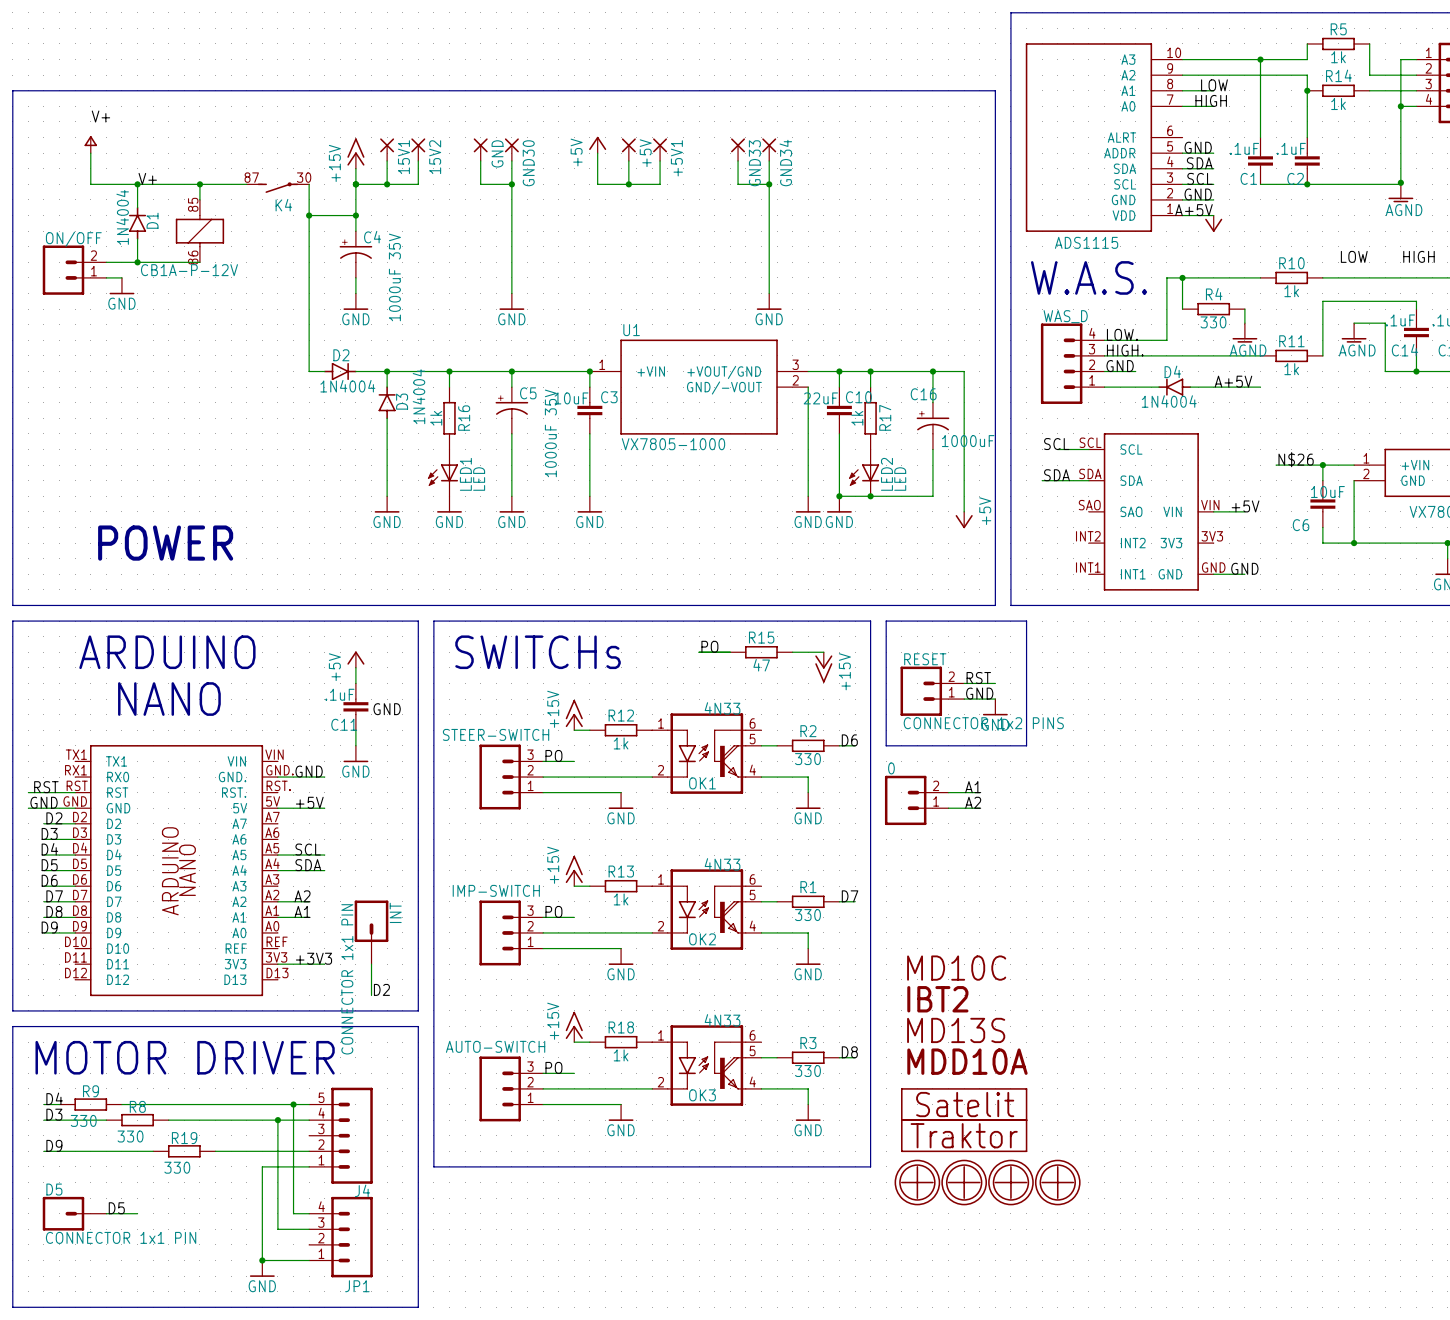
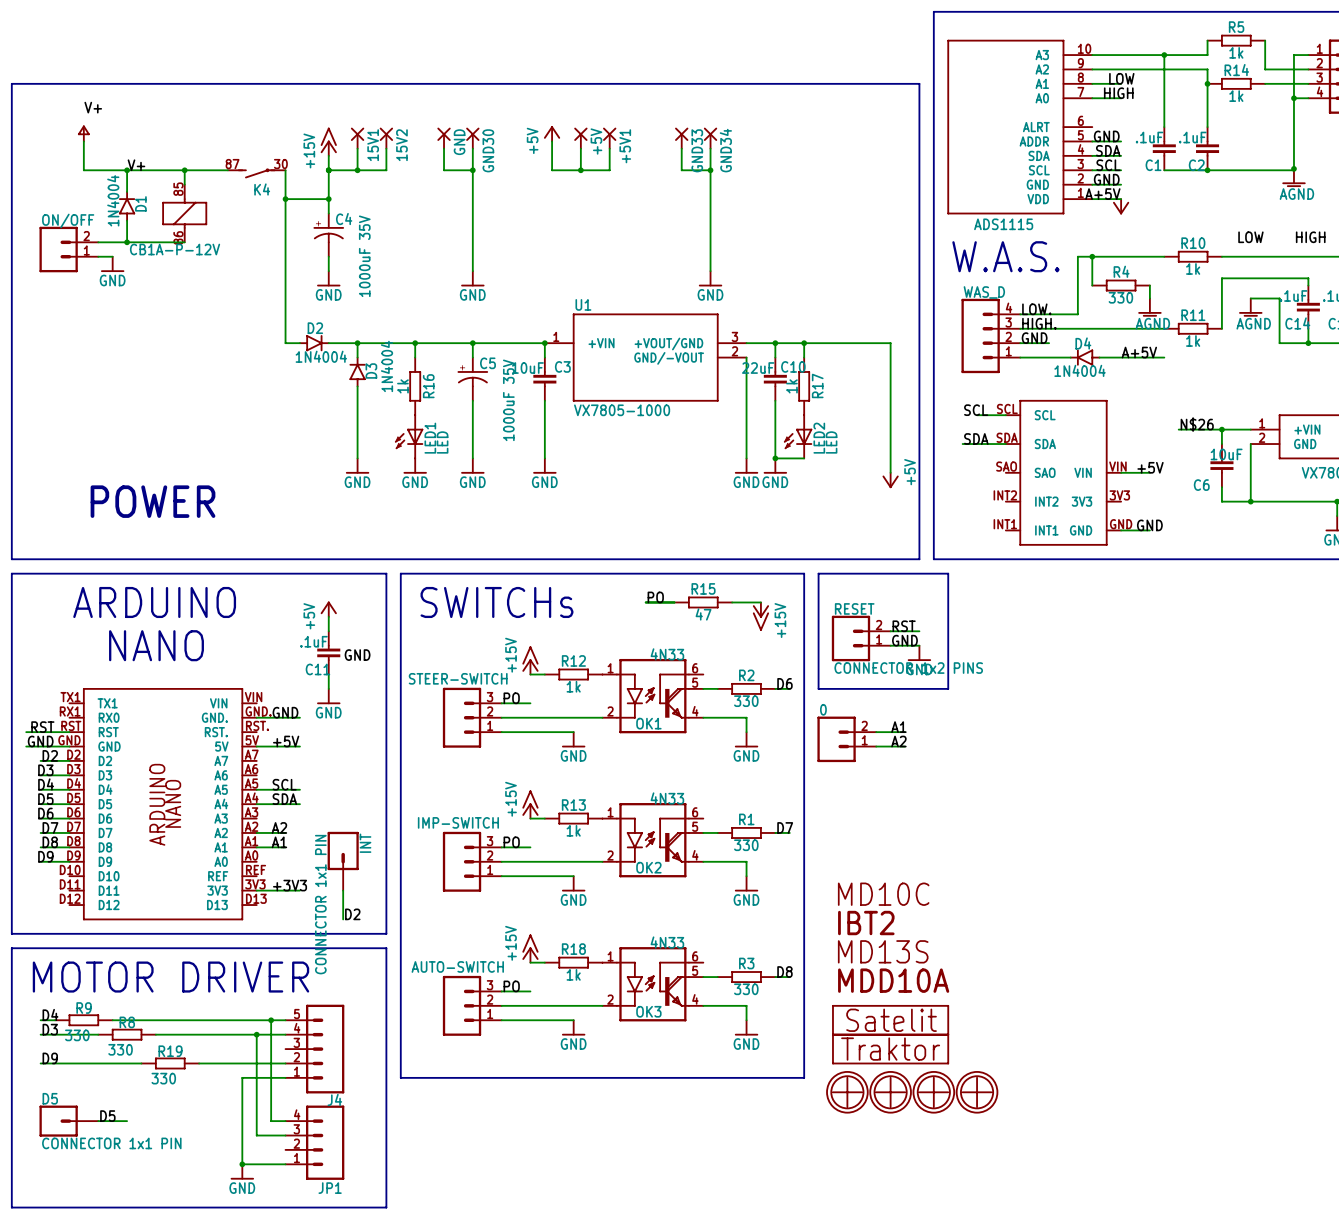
wire: (932, 371) (932, 402) -> none
junction: (932, 371) -> none
C16: 1000uF (932, 426) -> none
wire: (932, 449) (932, 496) (870, 496) -> none
junction: (870, 496) -> none

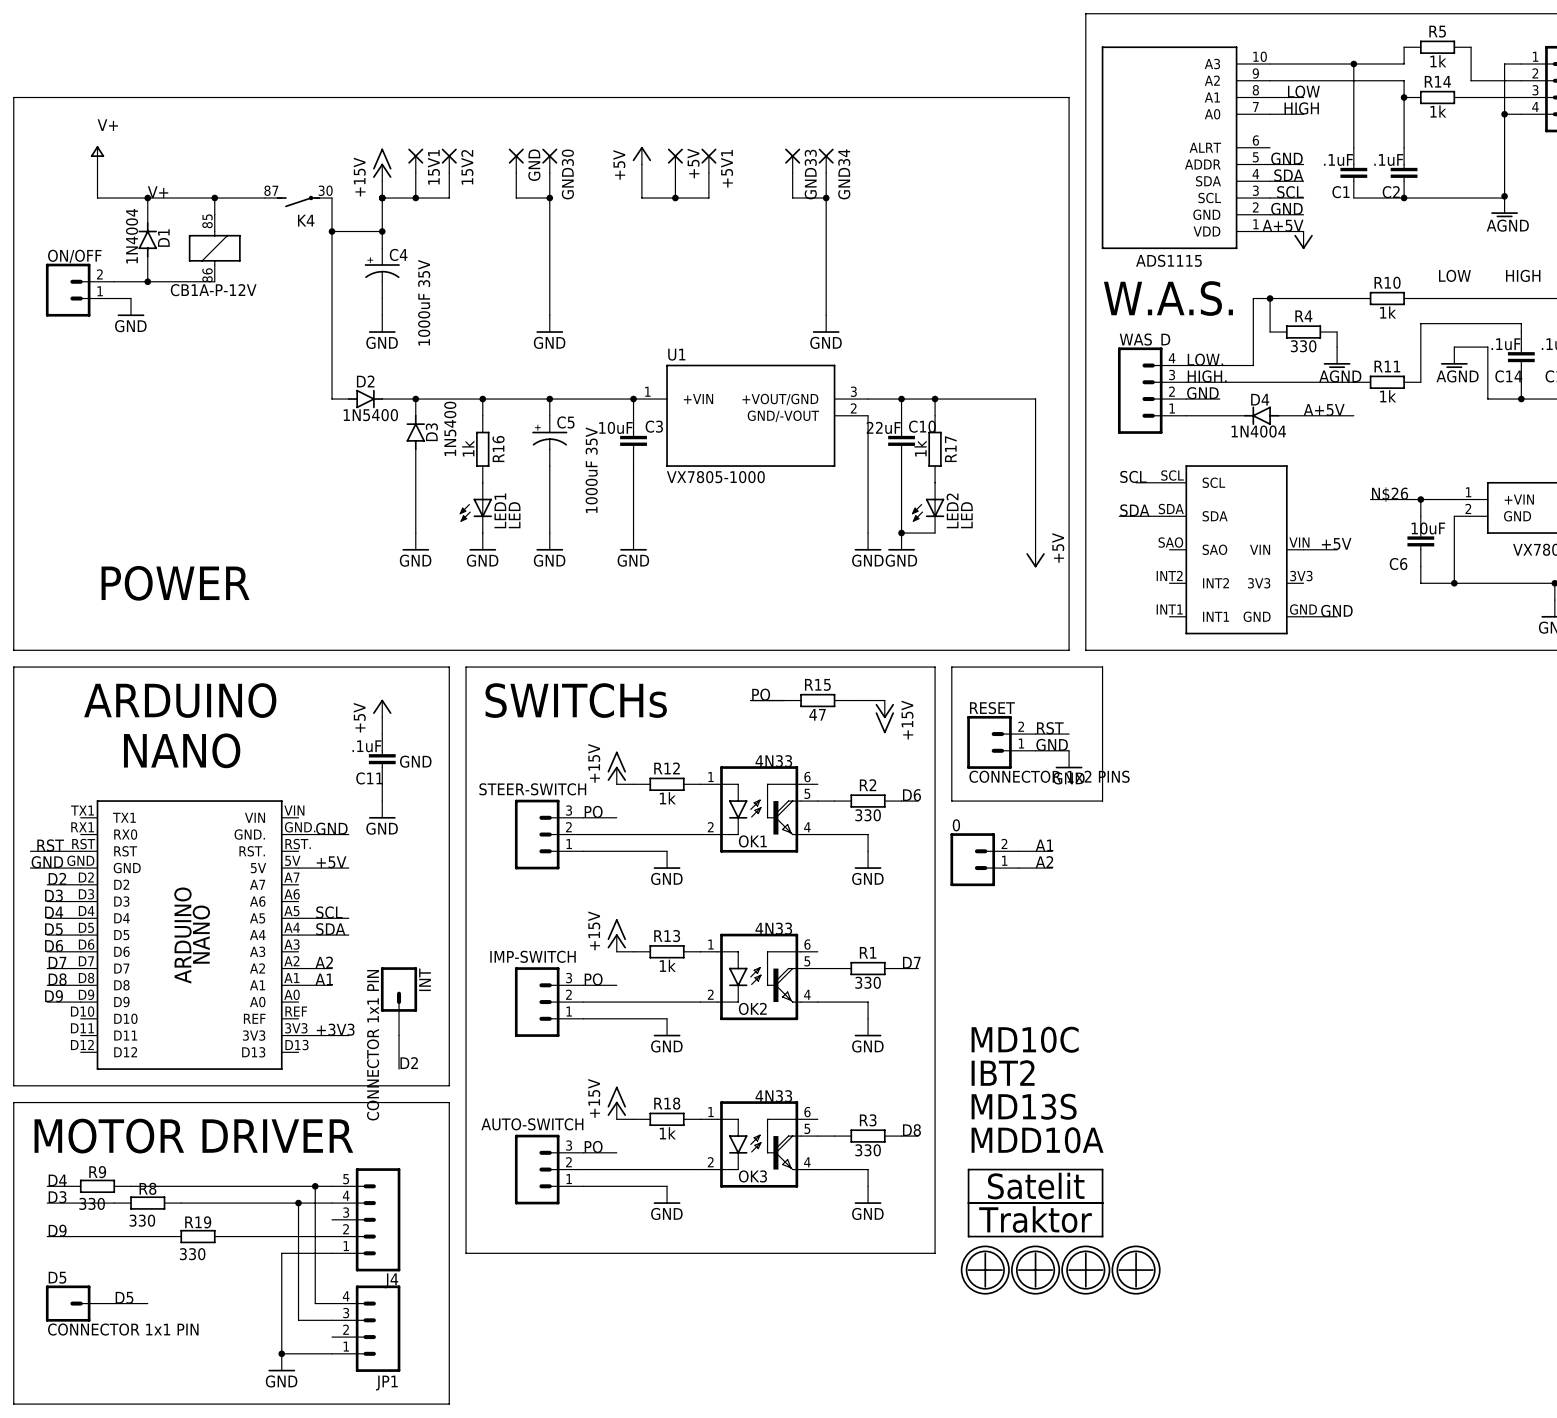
D2 value: 1N4004 (321, 356) -> 1N5400 (370, 415)
D3 value: 1N4004 (387, 366) -> 1N5400 (450, 428)

